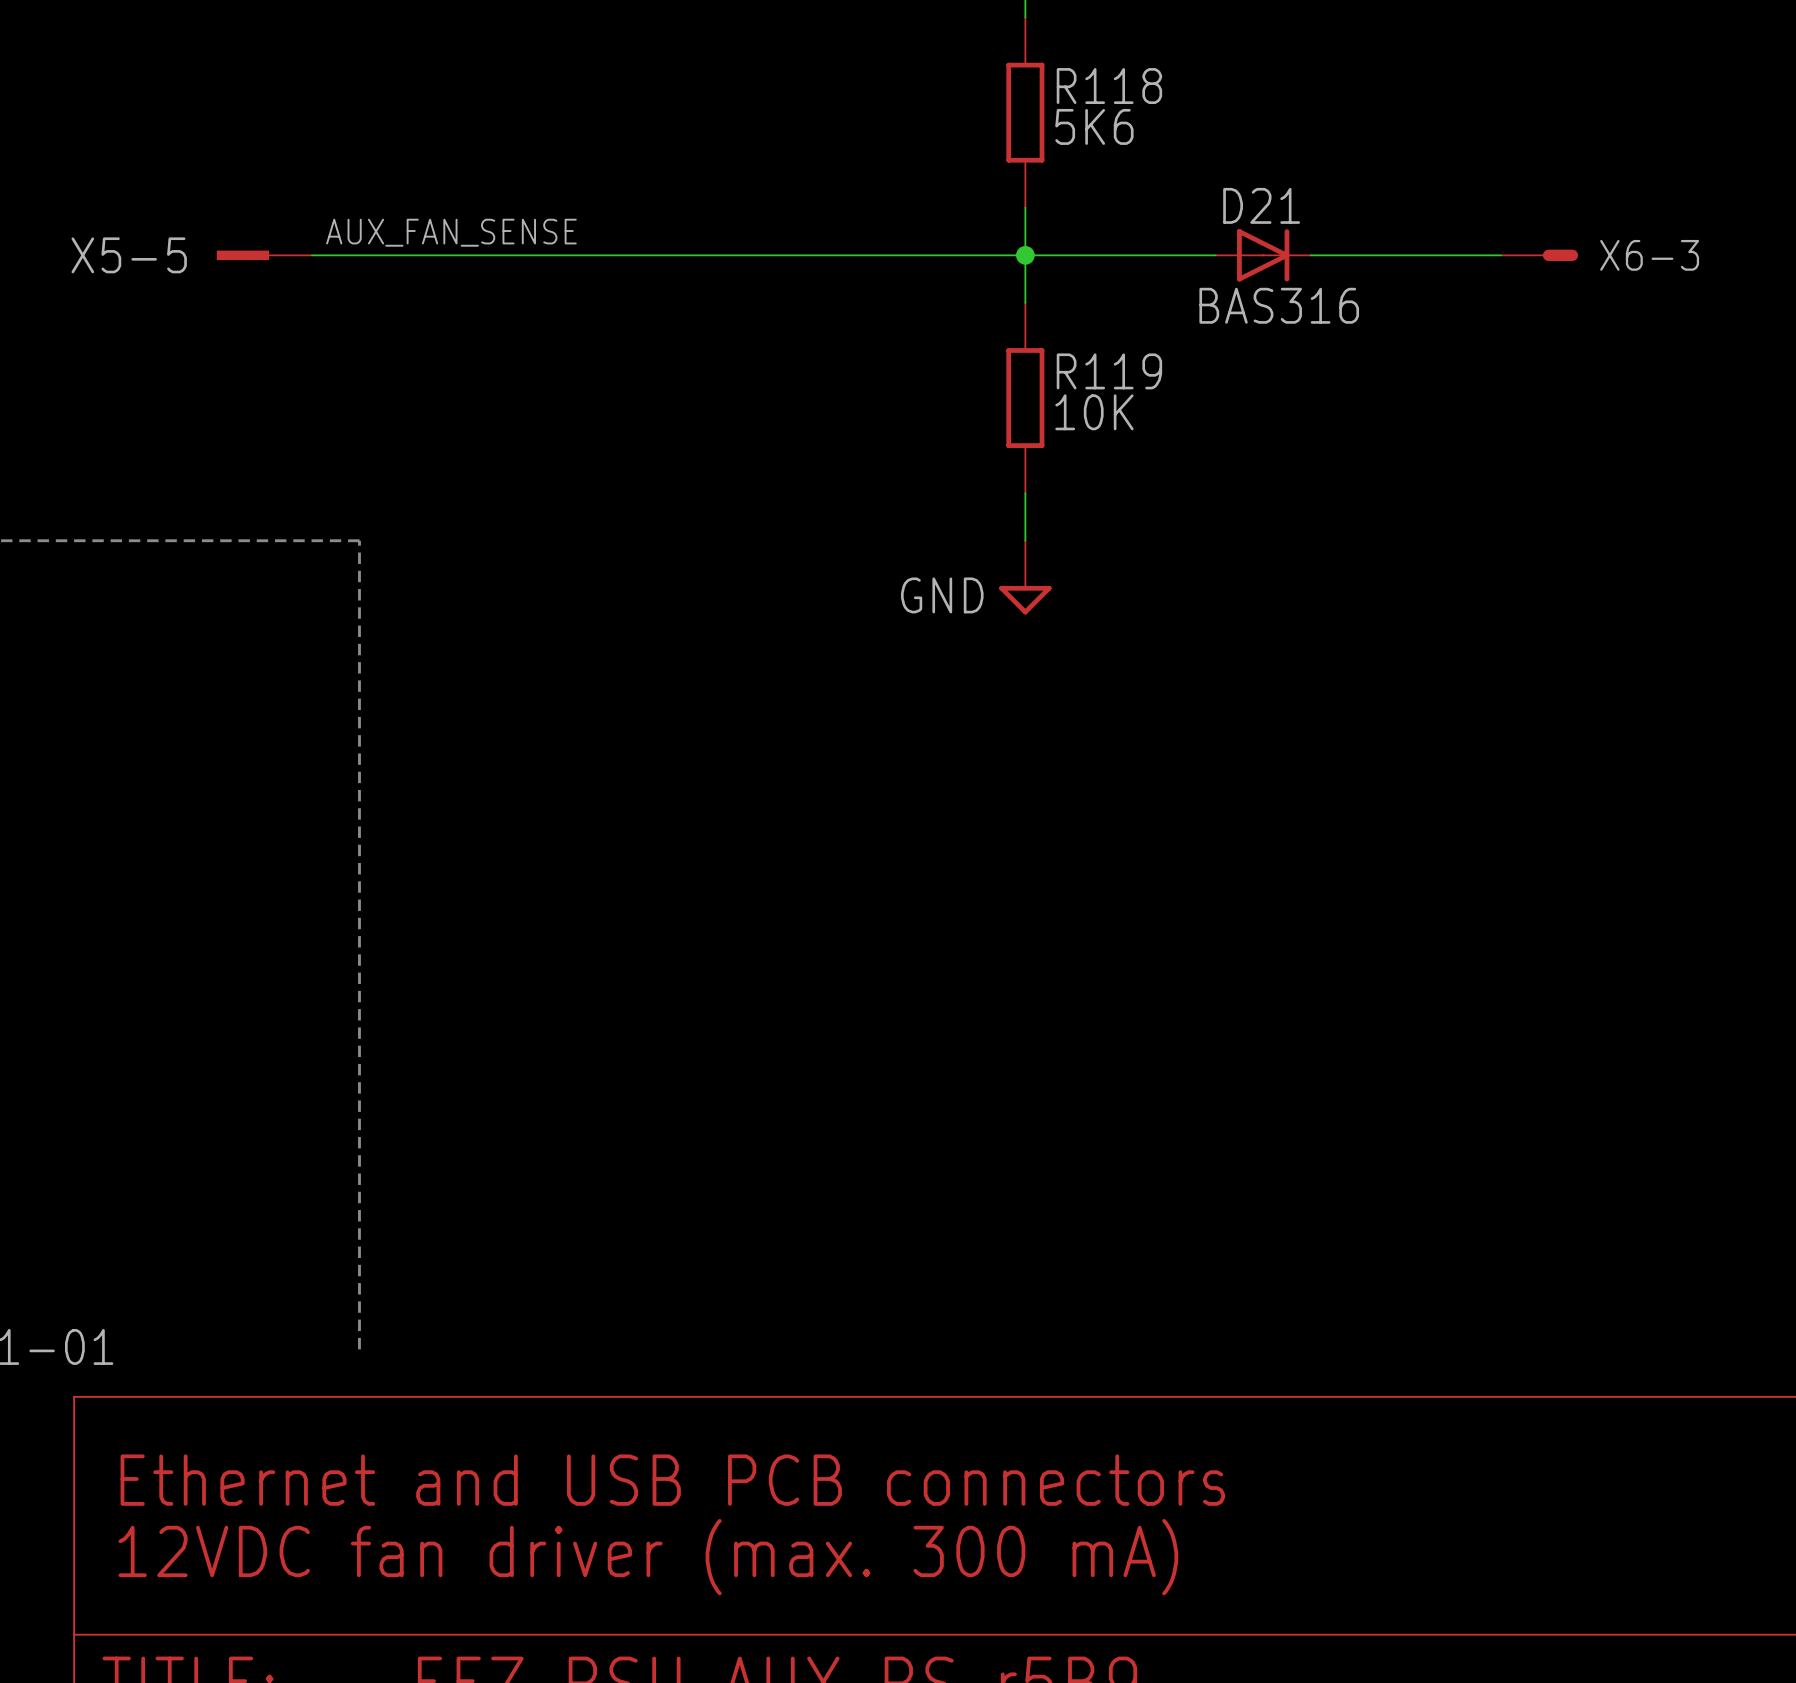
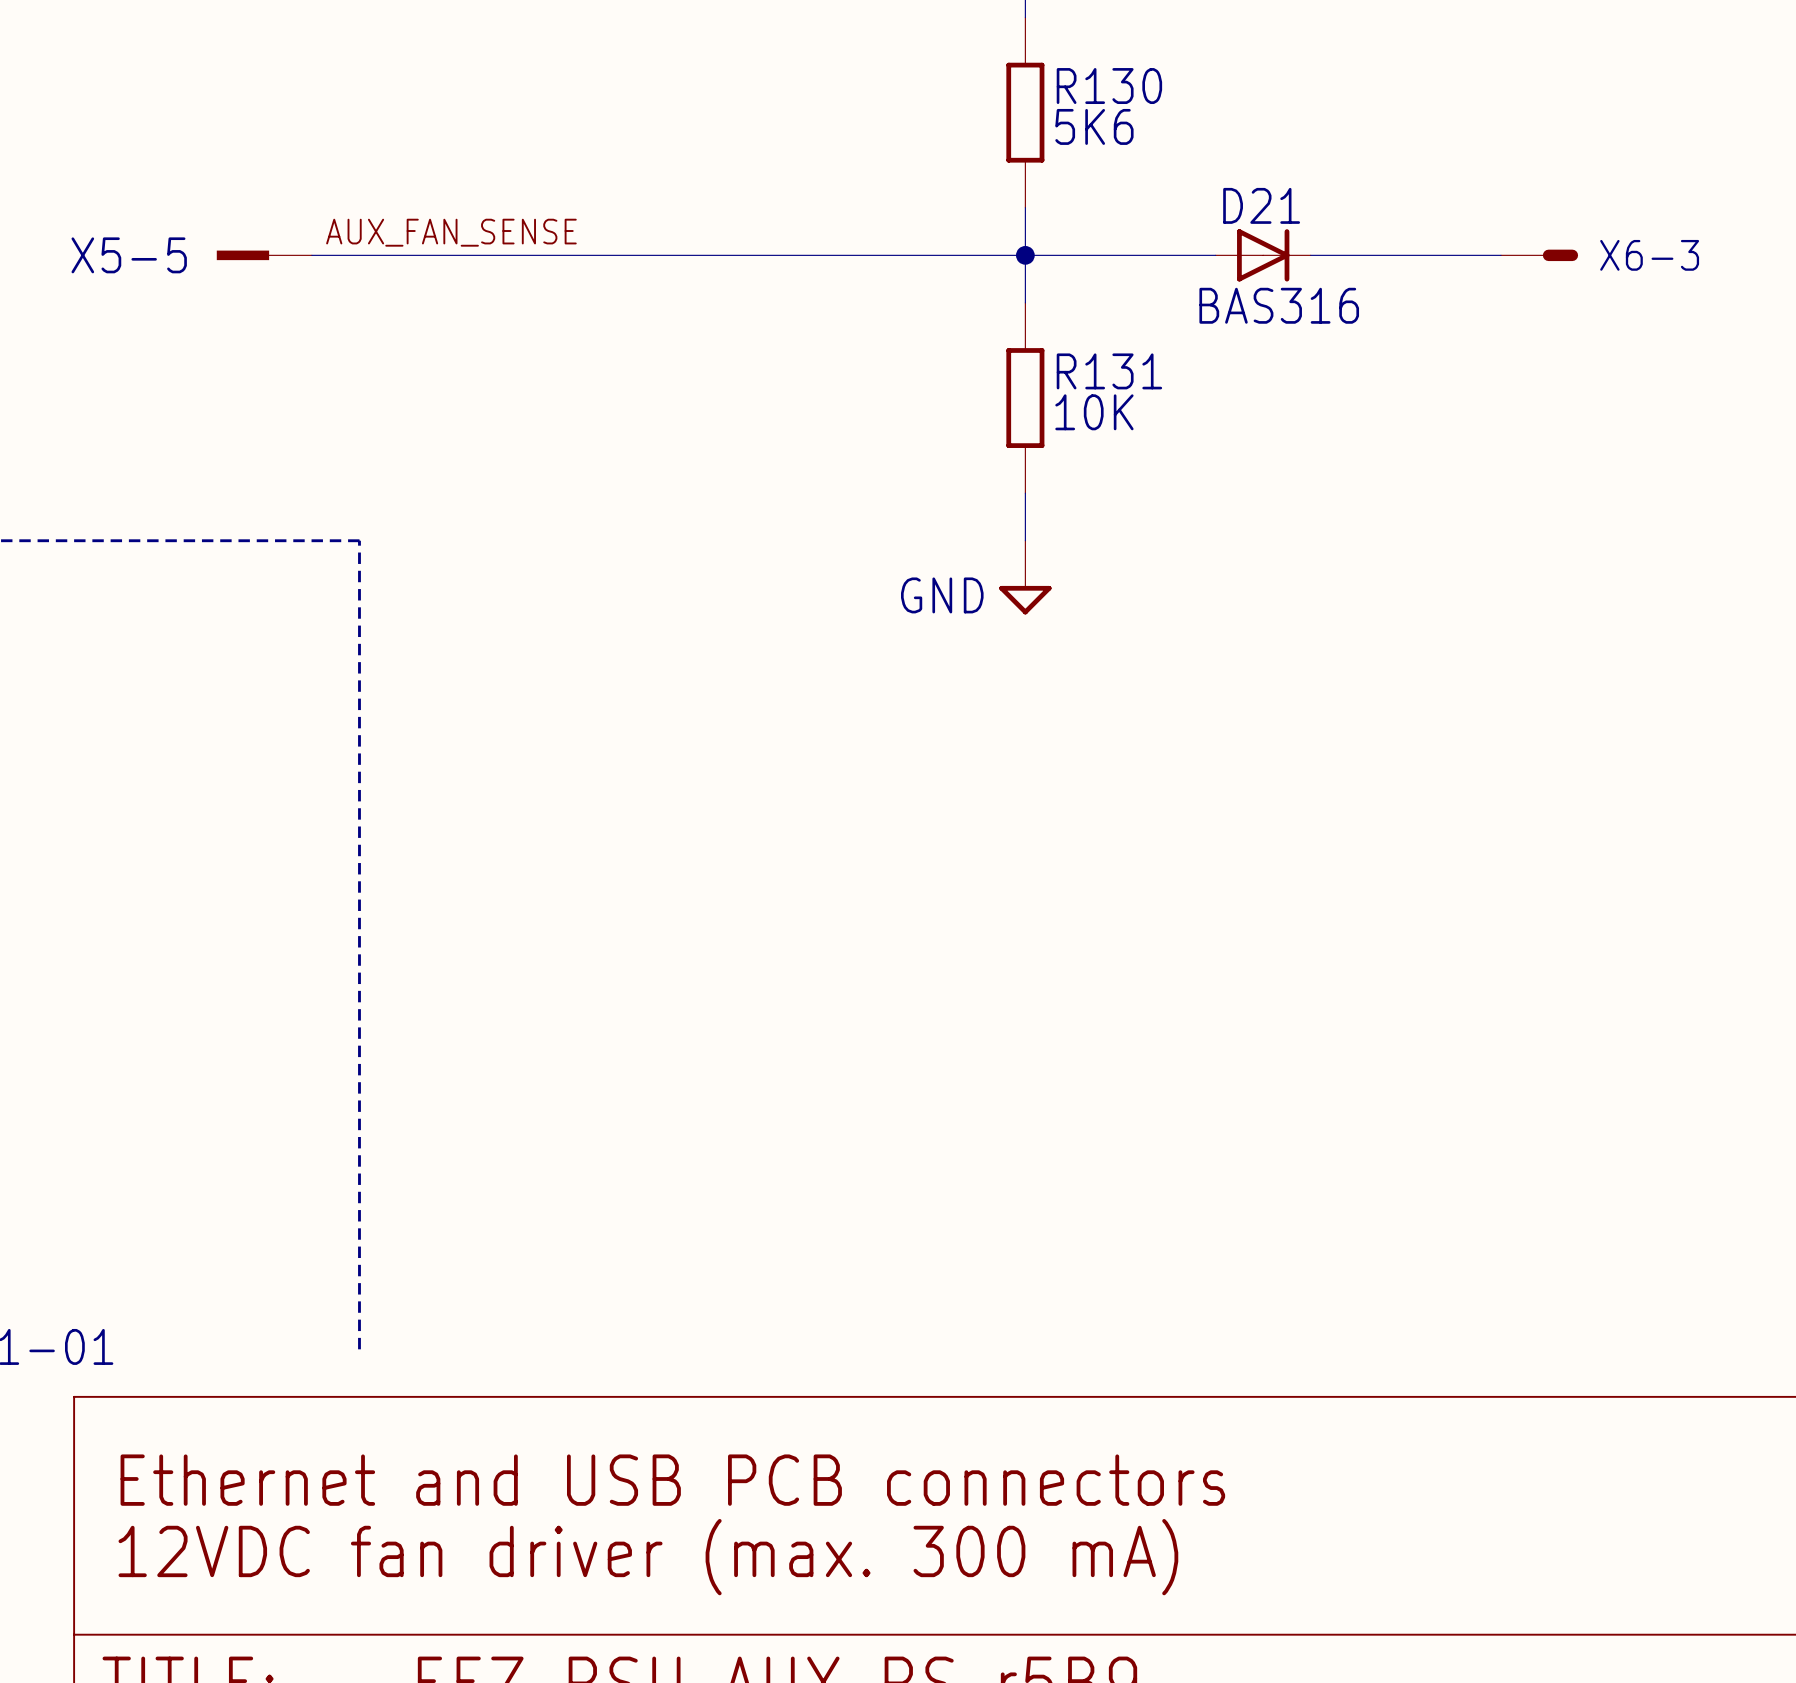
R118 name: R118 (1109, 86) -> R130 (1109, 86)
R119 name: R119 (1109, 371) -> R131 (1109, 371)

